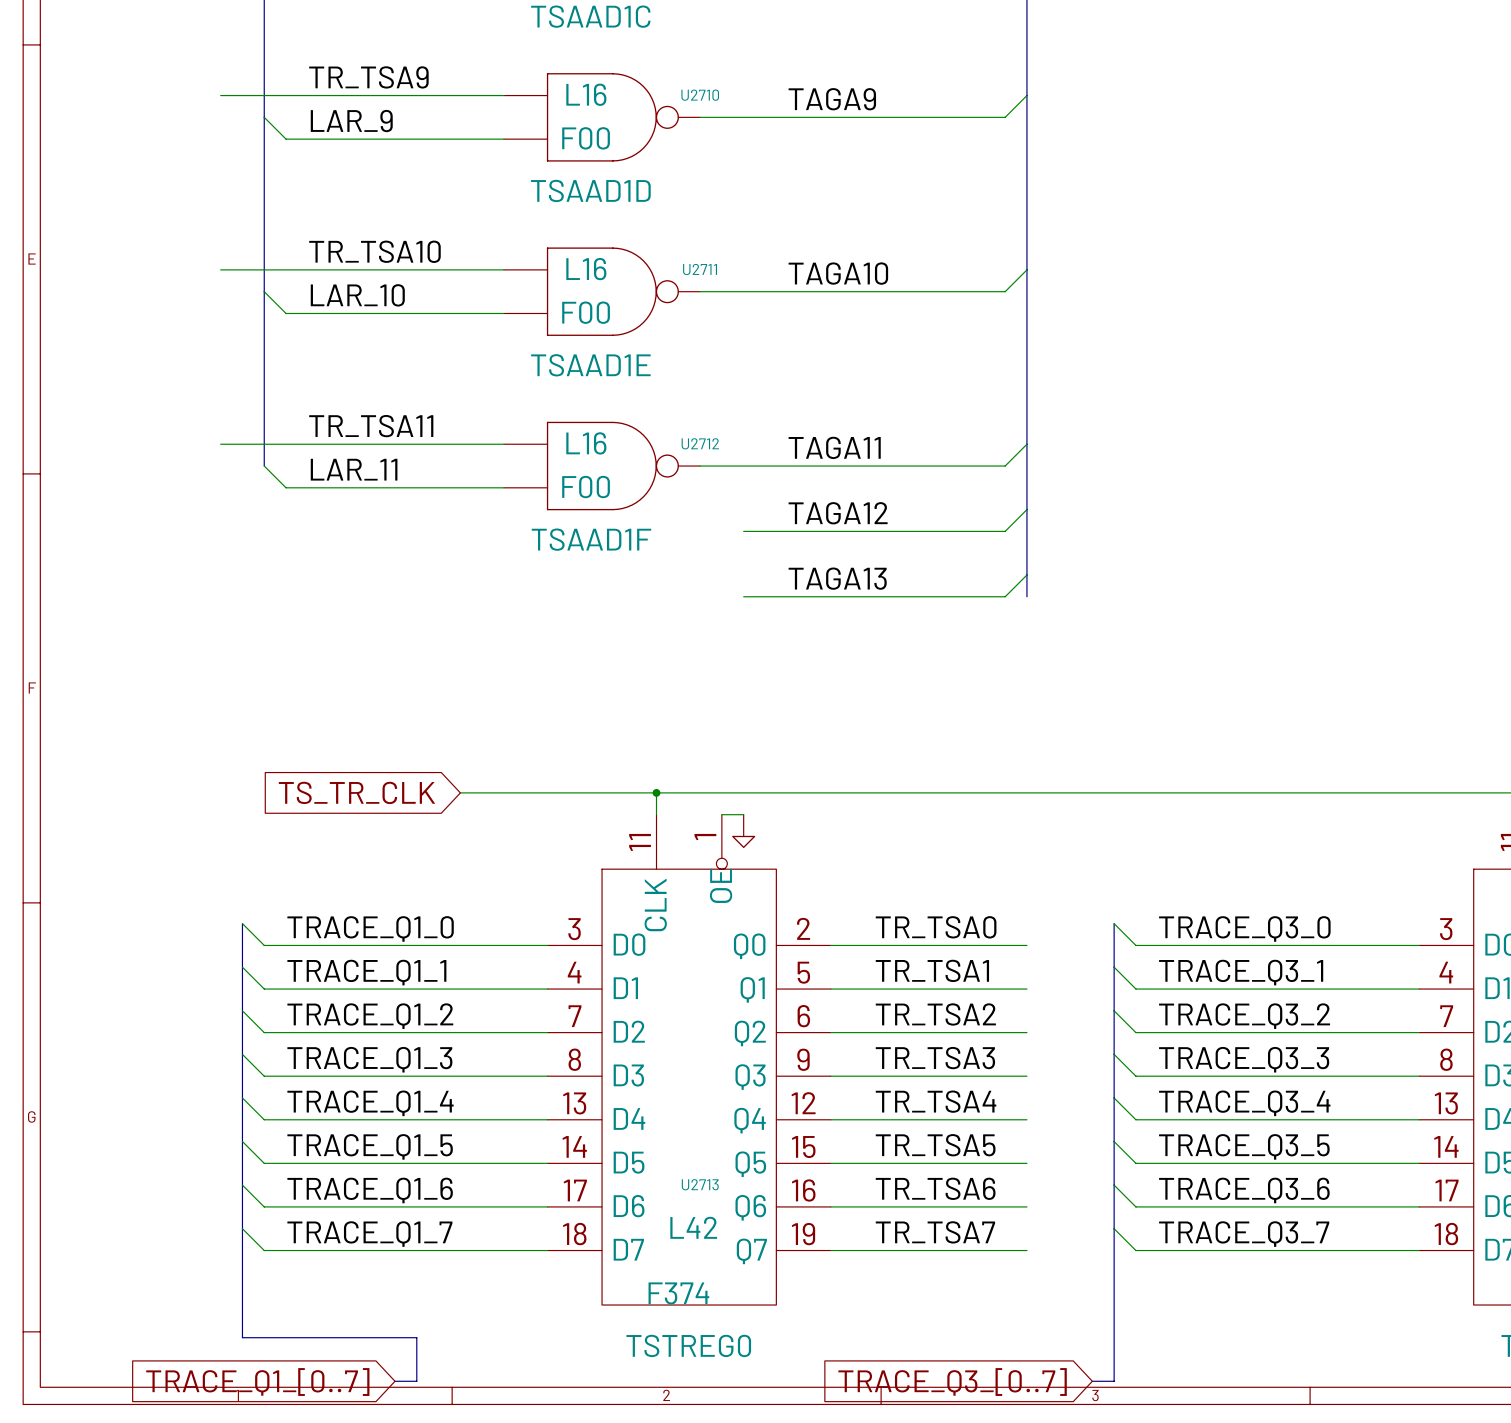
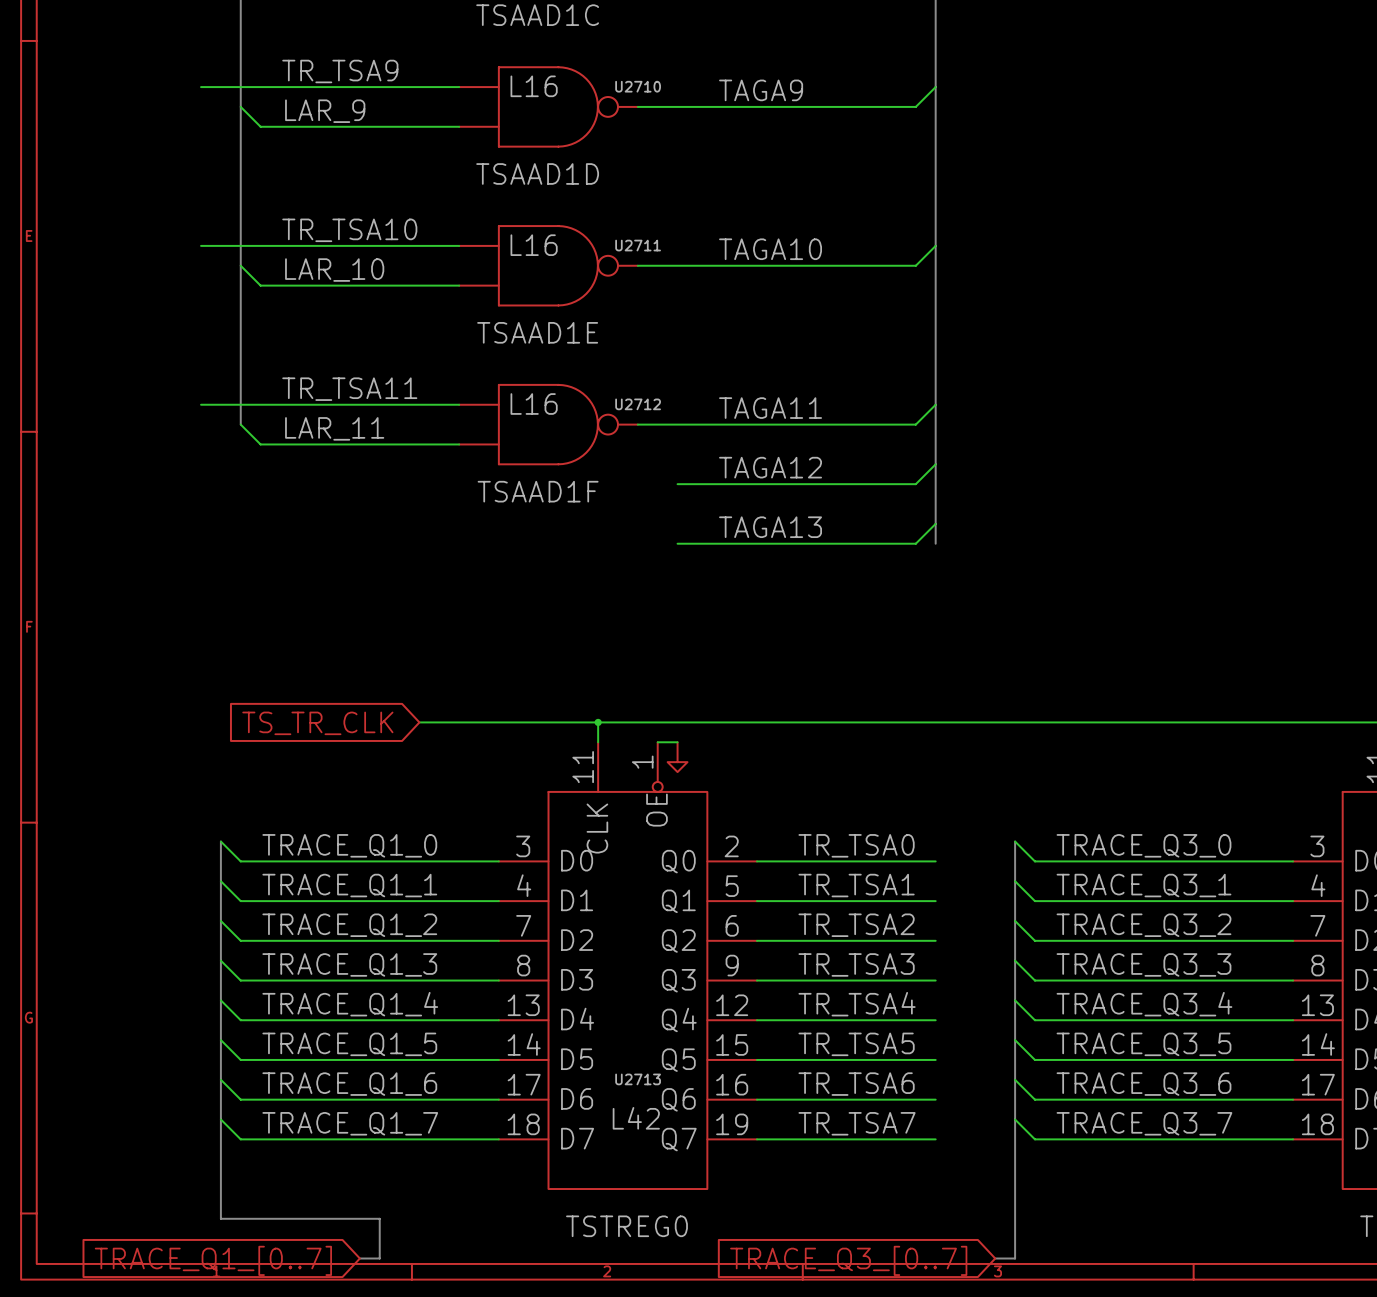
U2710 value: F00 (586, 138) -> none
U2711 value: F00 (586, 312) -> none
U2712 value: F00 (586, 487) -> none
U2713 value: F374 (678, 1293) -> none

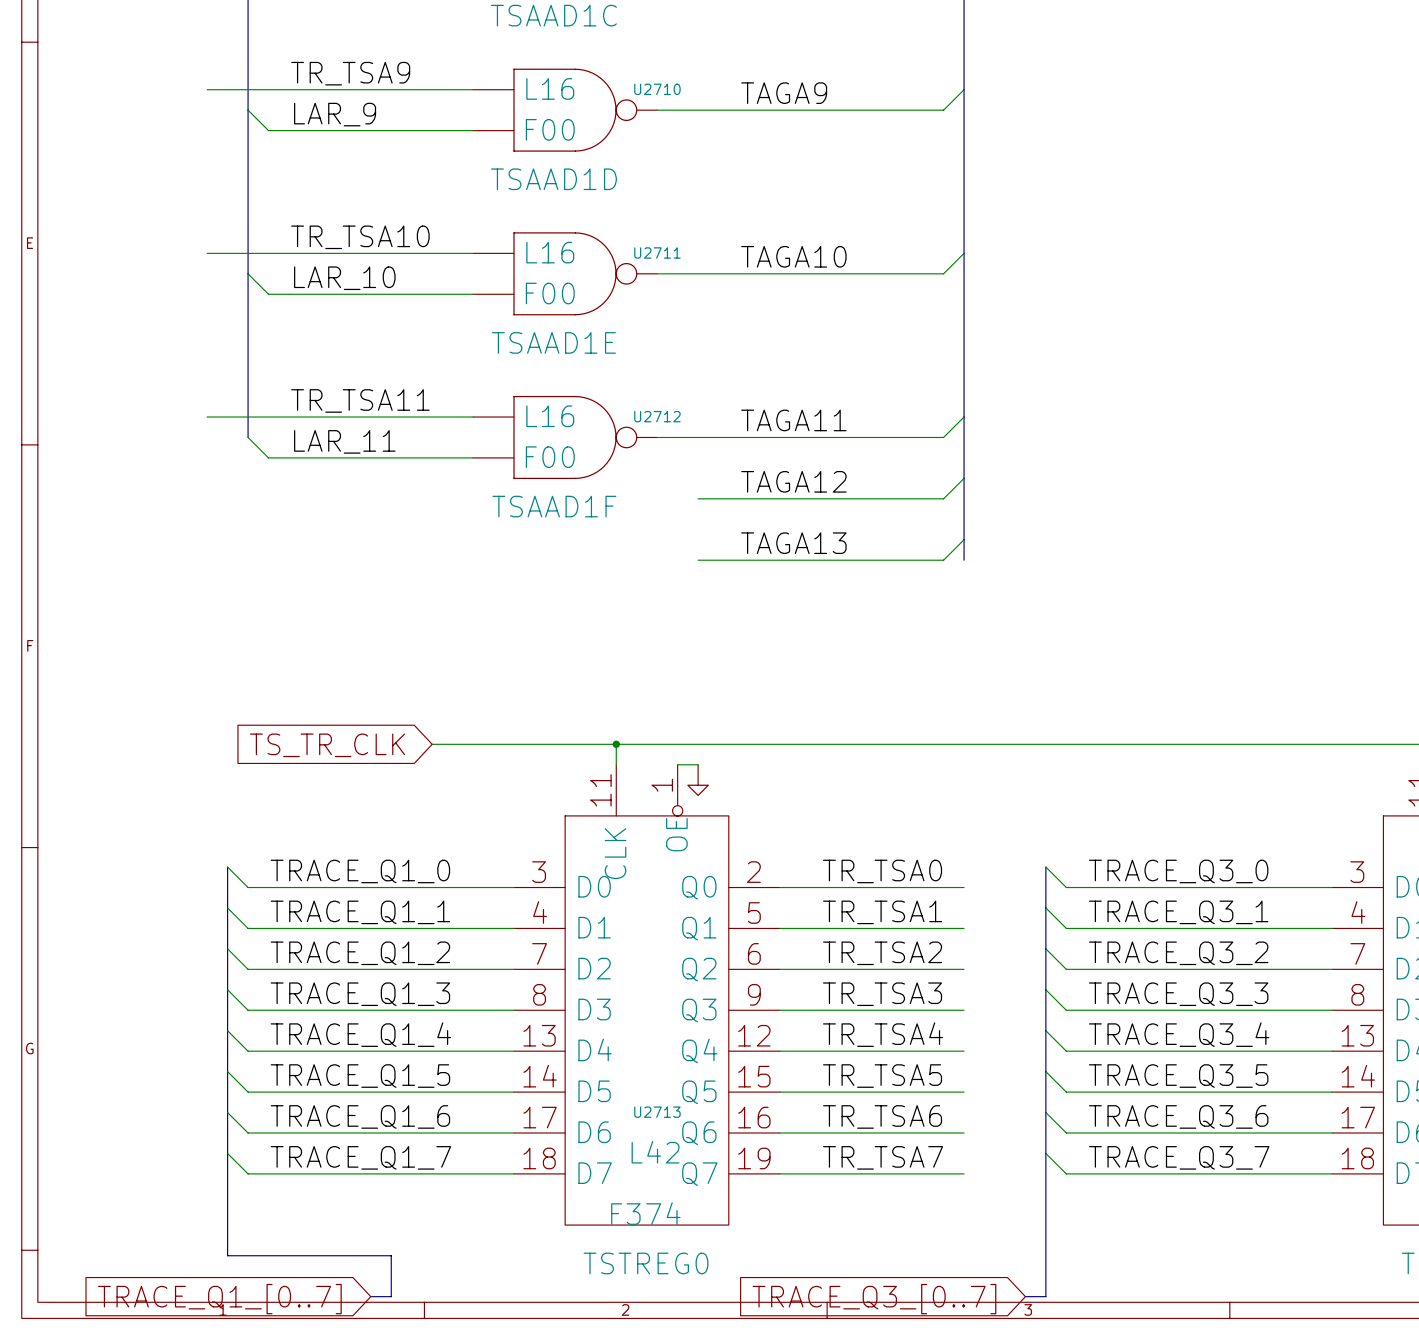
U2710 value: none -> F00 (550, 129)
U2711 value: none -> F00 (550, 293)
U2712 value: none -> F00 (550, 457)
U2713 value: none -> F374 (645, 1213)

